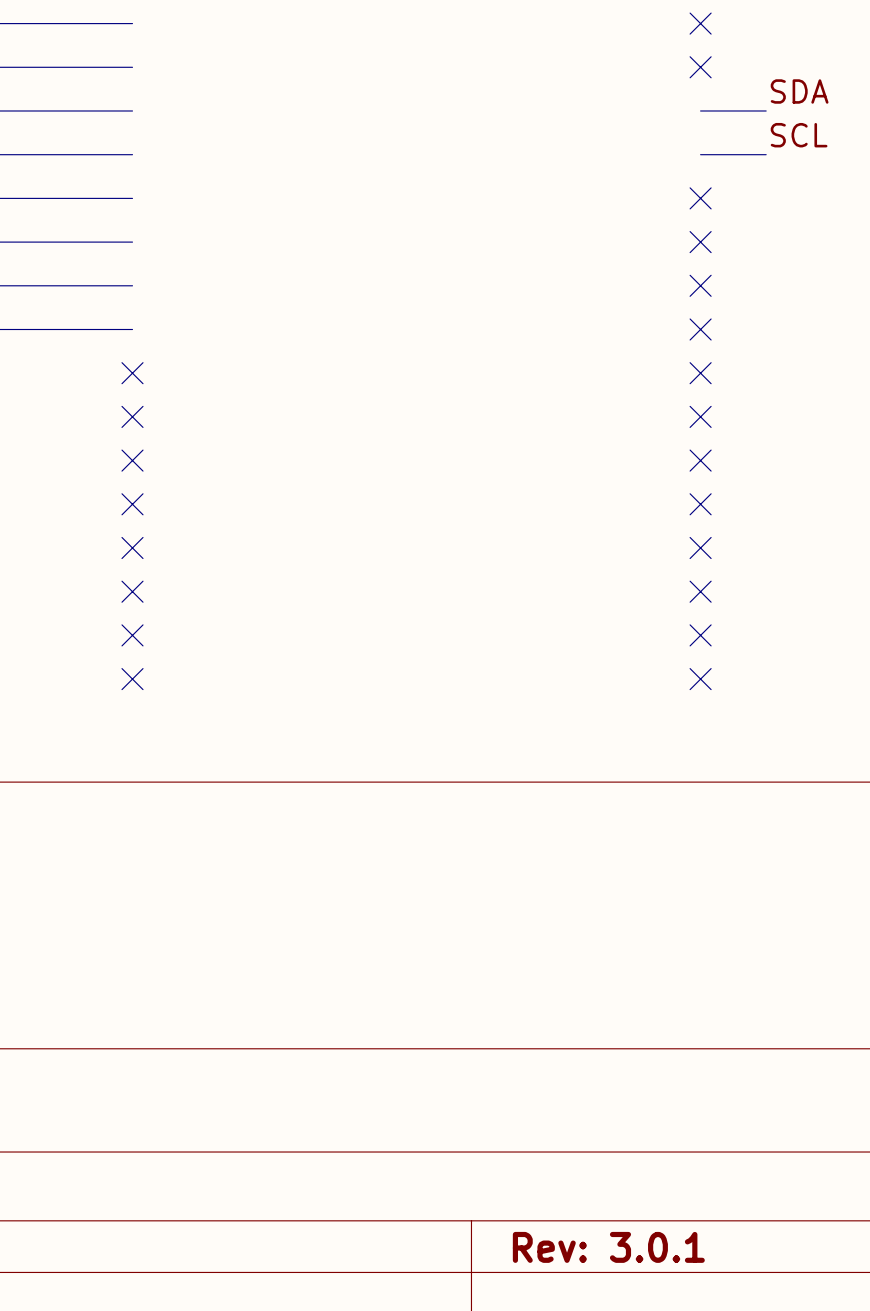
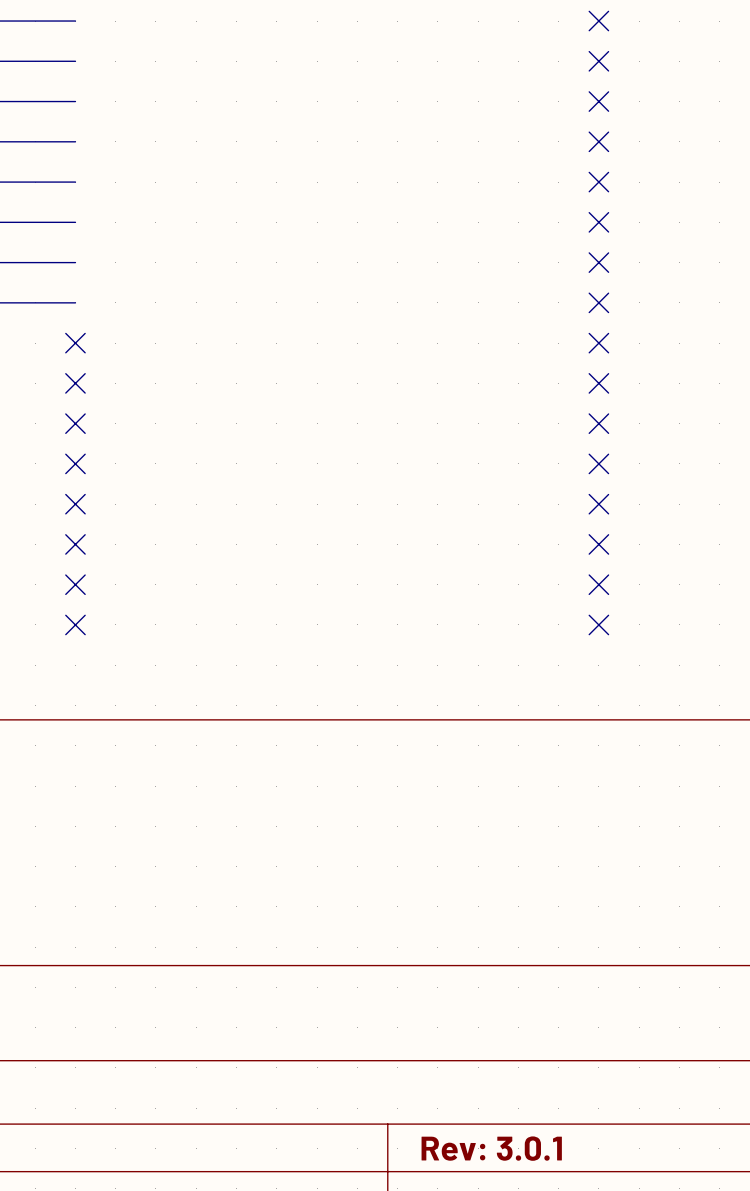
label: SDA (799, 91) -> none
wire: (700, 110) (766, 110) -> none
no-connect mark: none -> (598, 101)
label: SCL (799, 135) -> none
wire: (700, 154) (766, 154) -> none
no-connect mark: none -> (598, 141)

